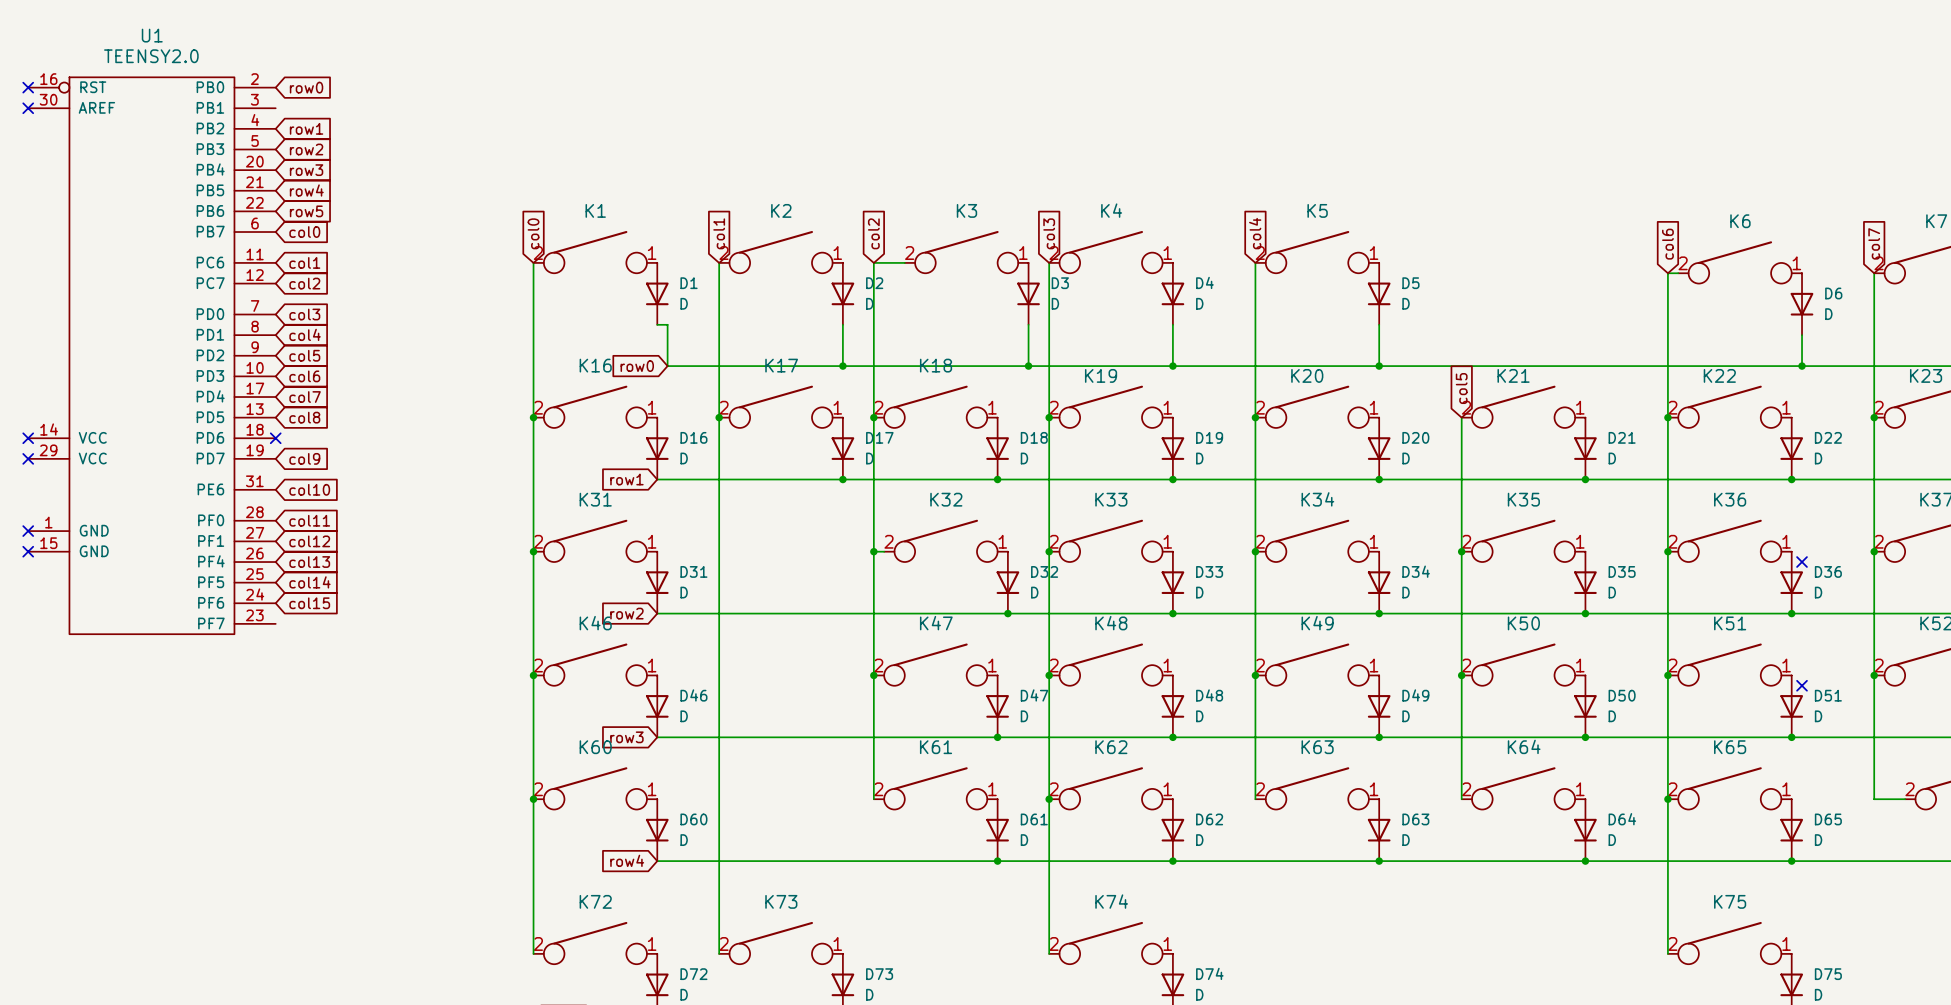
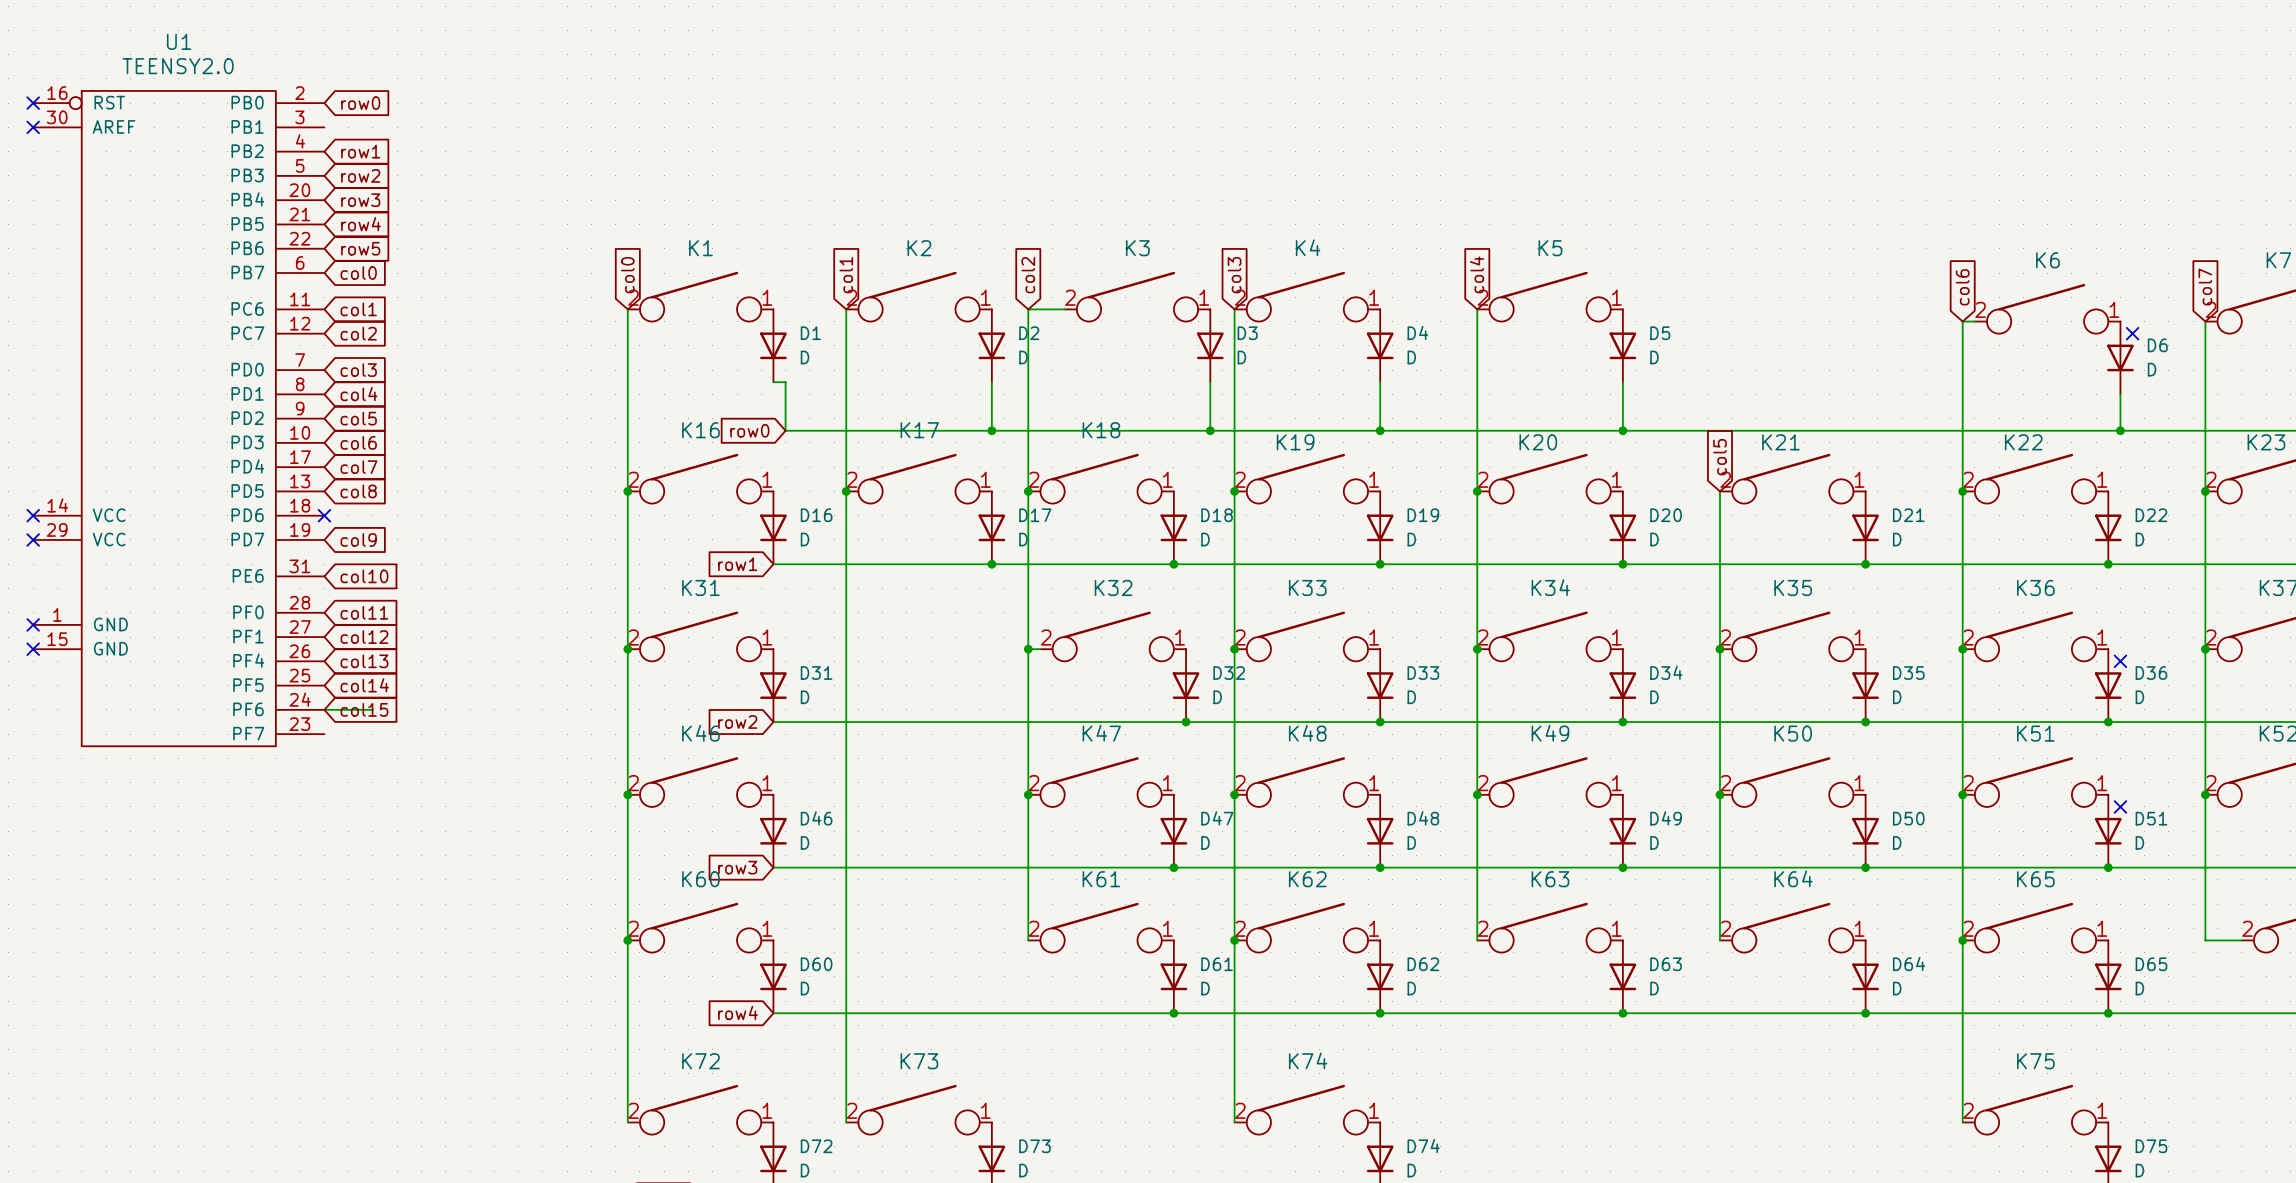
no-connect mark: none -> (2132, 333)
wire: none -> (324, 709) (372, 709)

